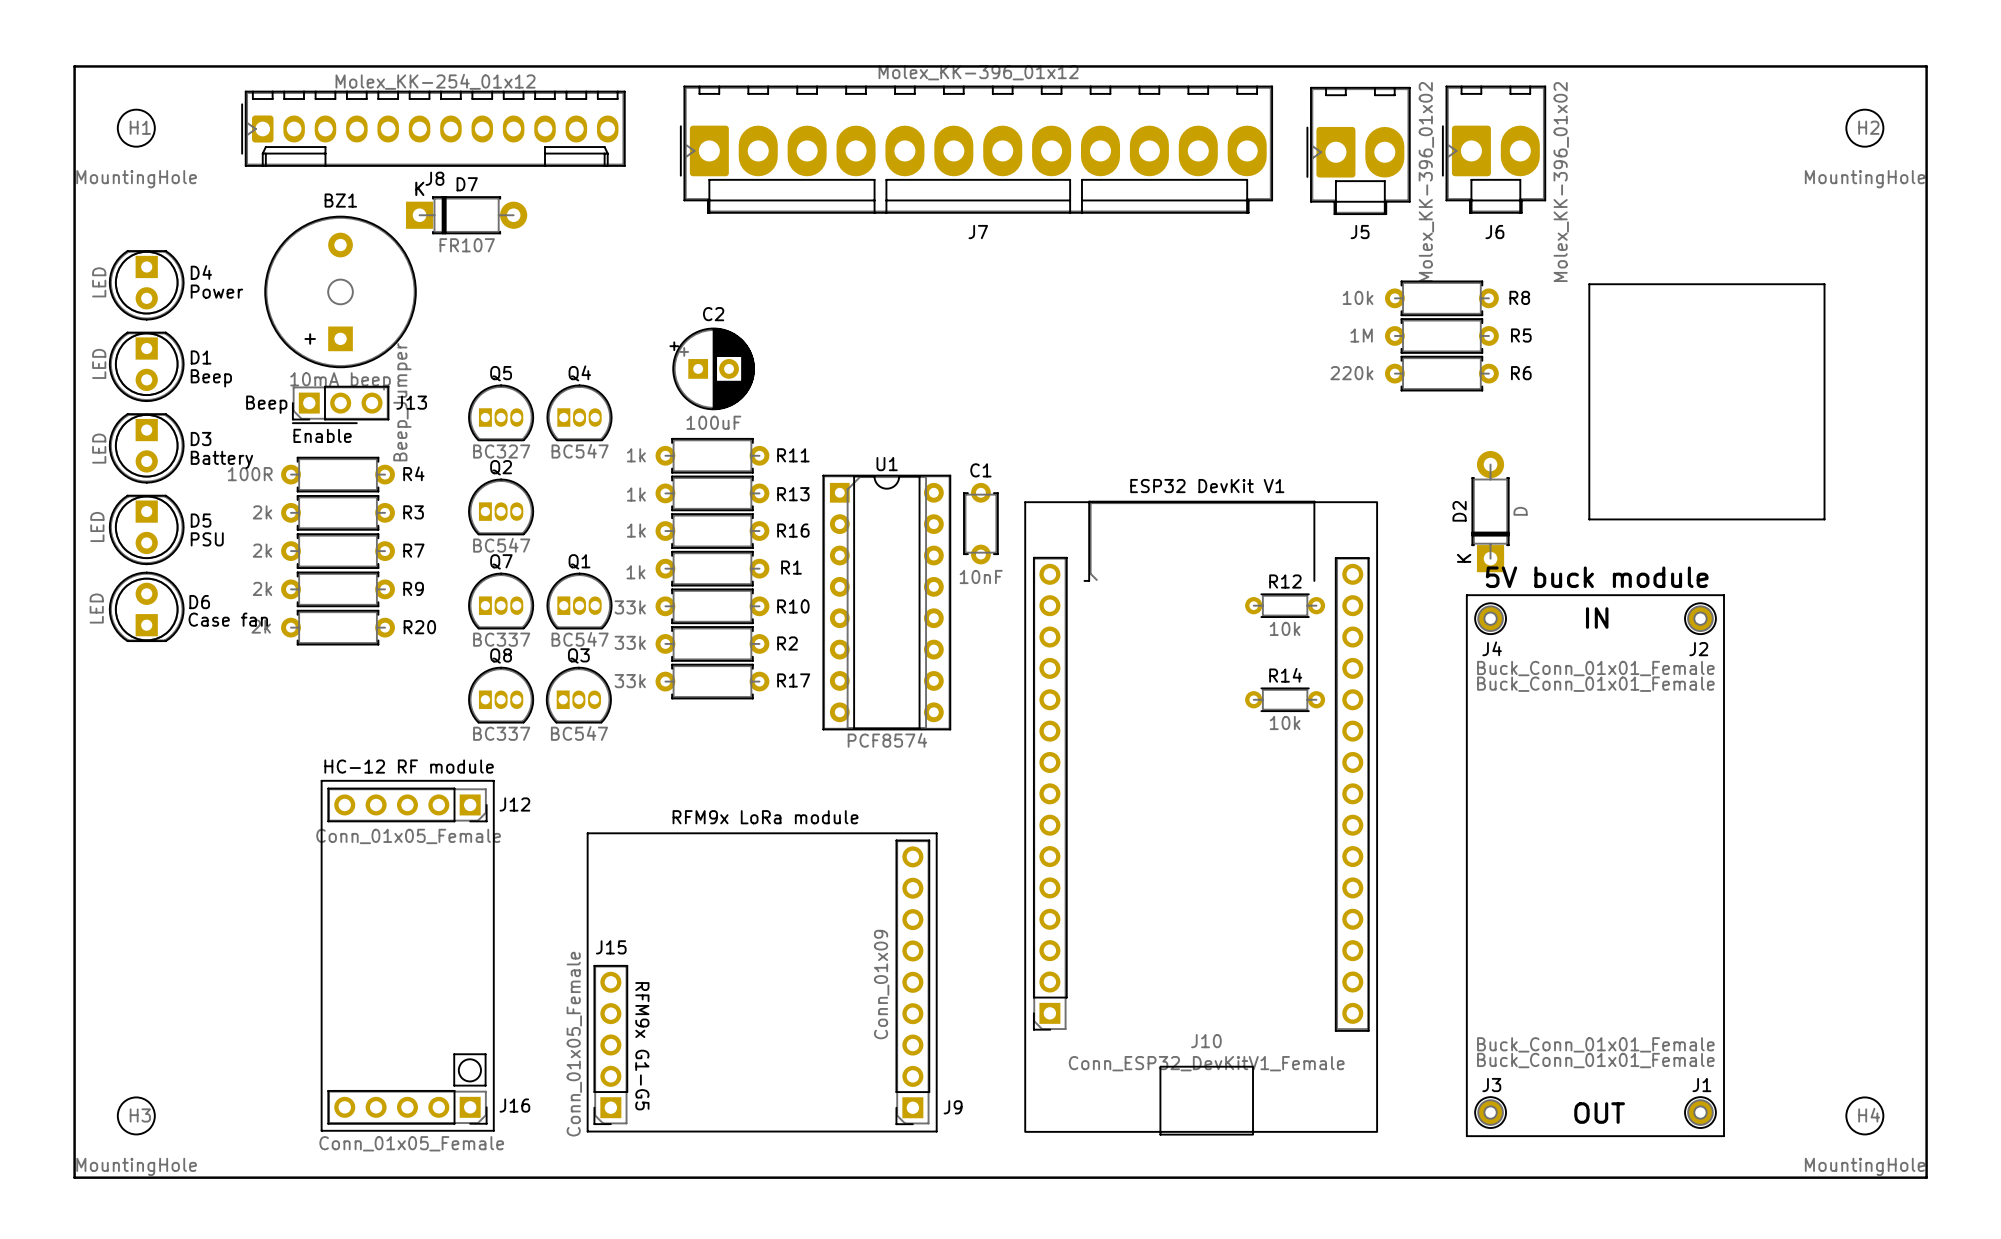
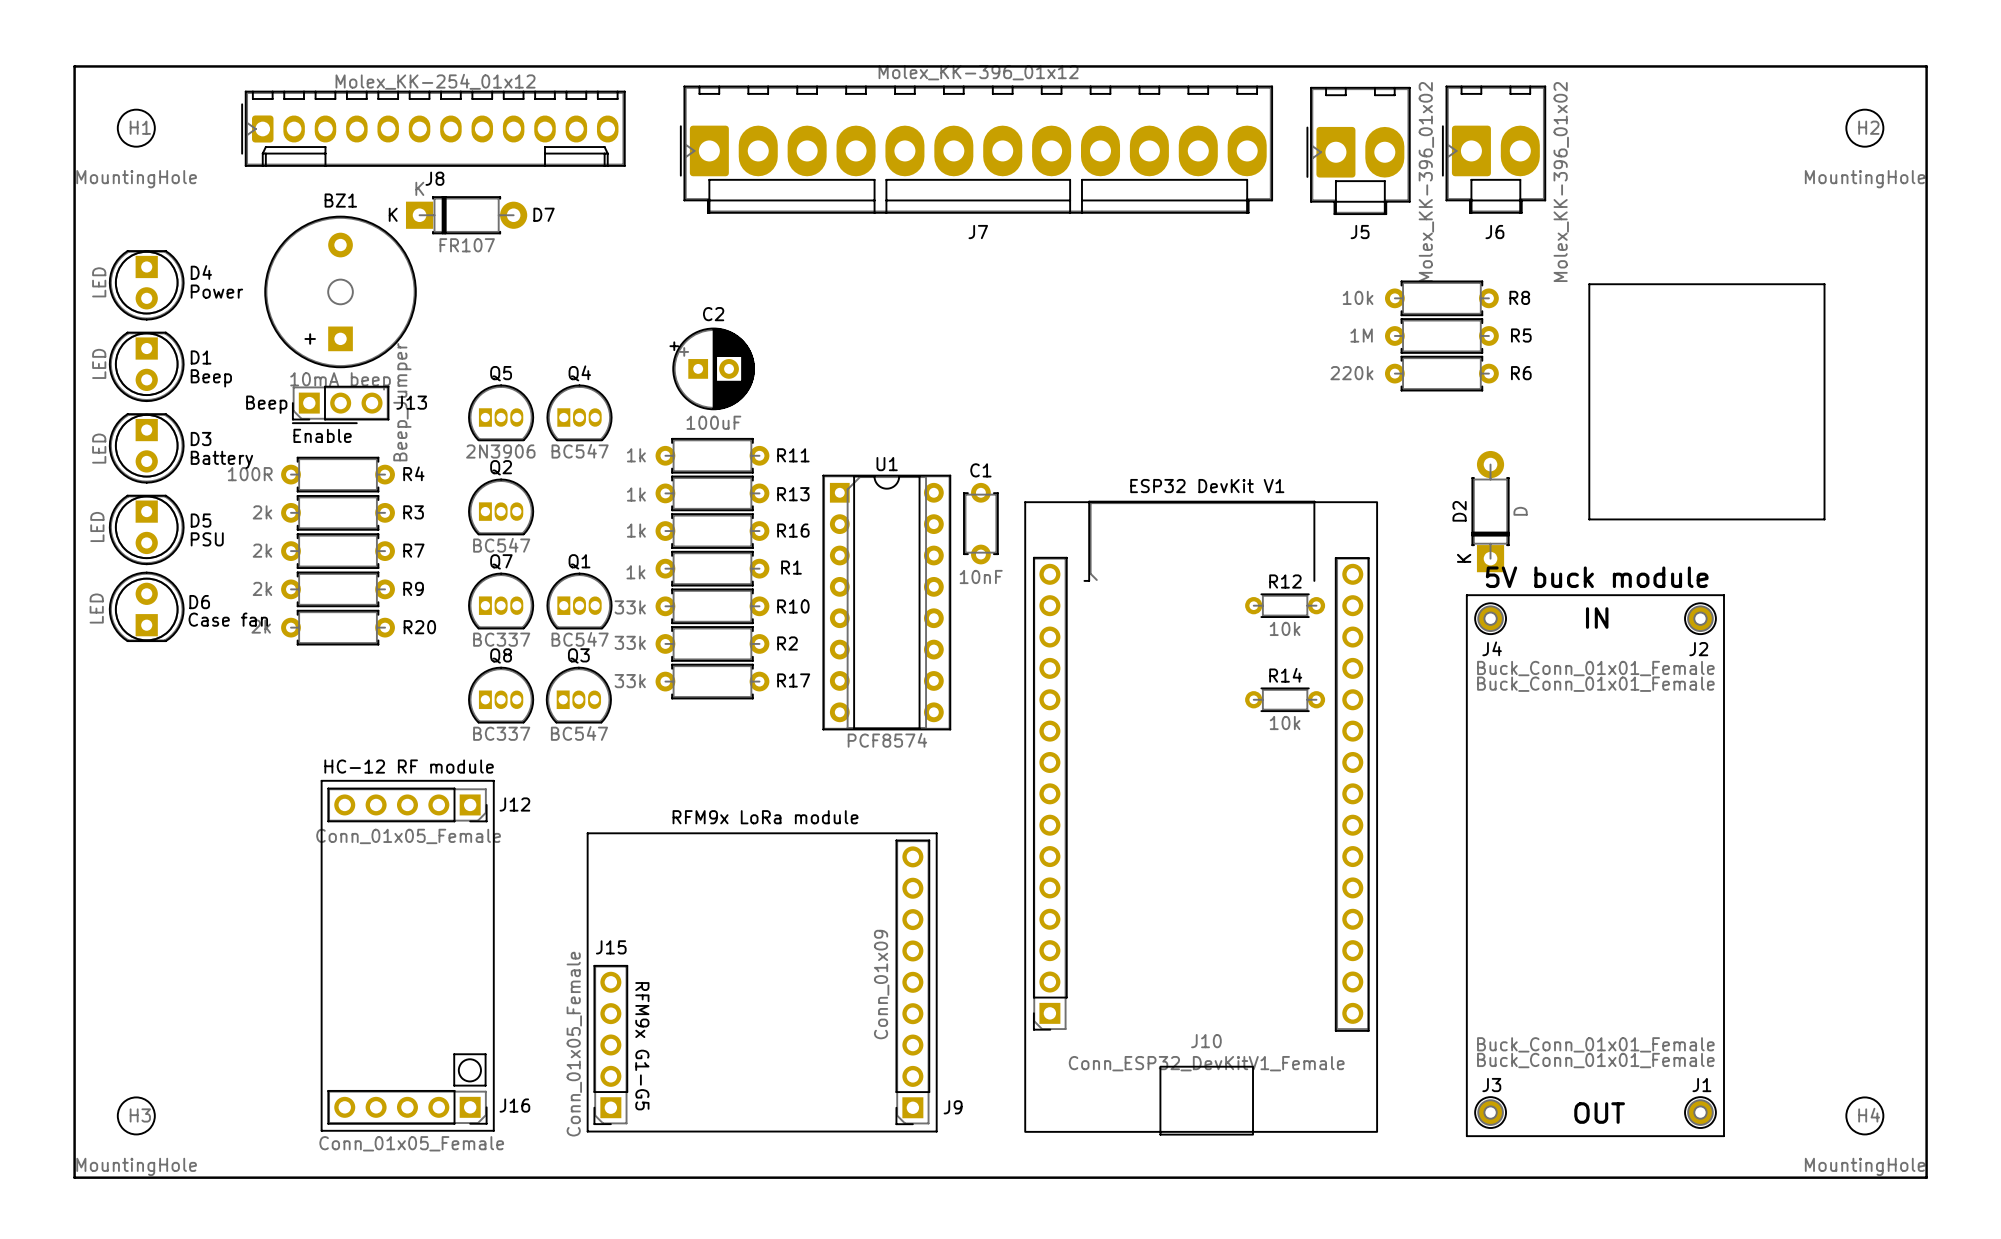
D7 name position: D7 (467, 184) -> D7 (544, 214)
D7 footprint: [405, 196, 528, 235] -> [405, 196, 528, 235]
Q5 value: BC327 (501, 451) -> 2N3906 (500, 451)

